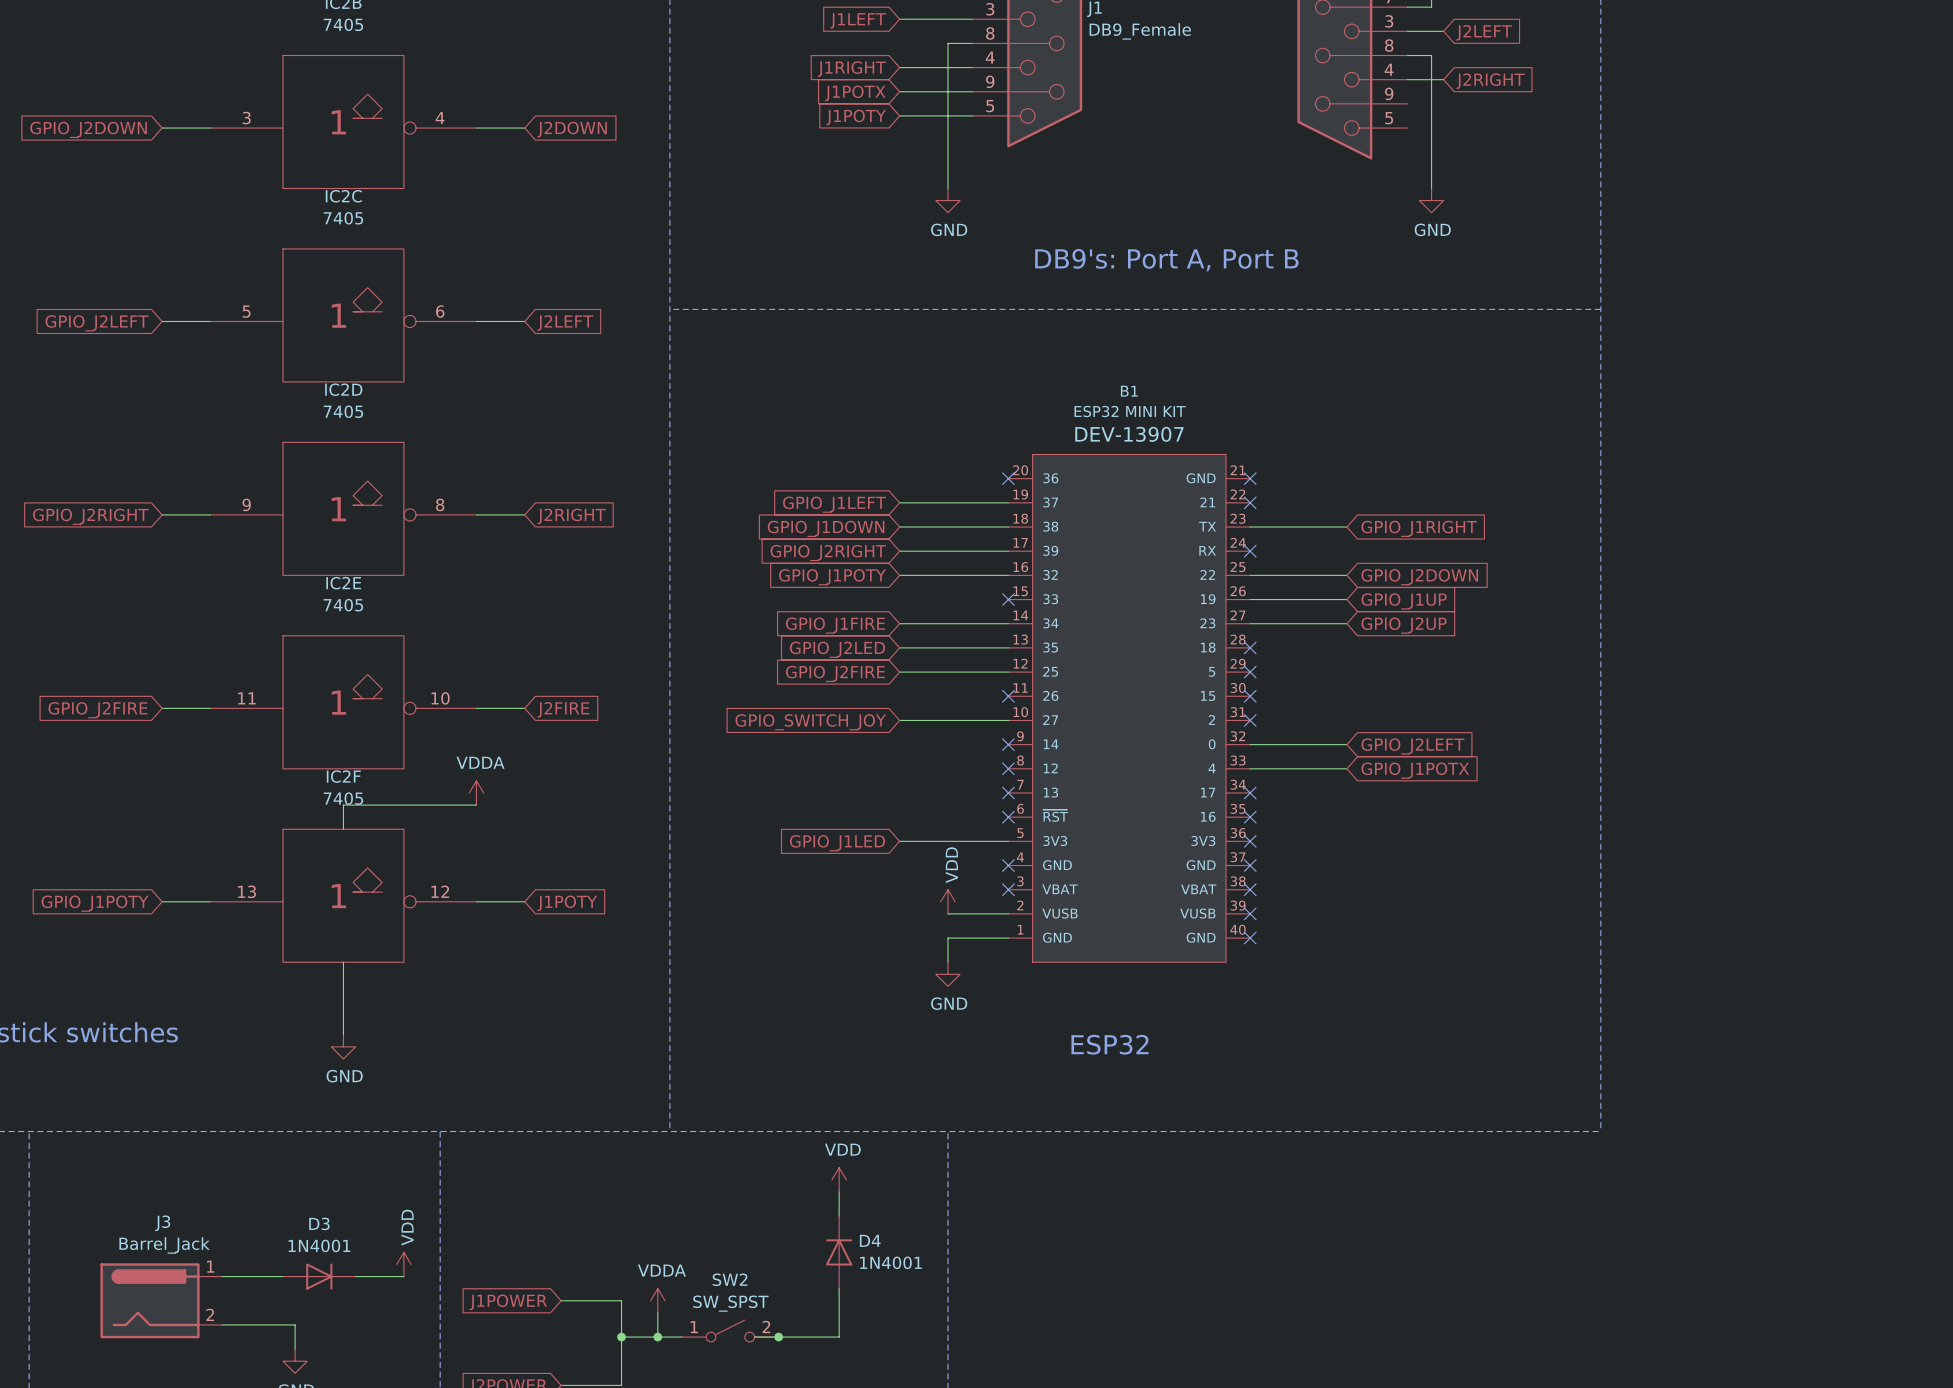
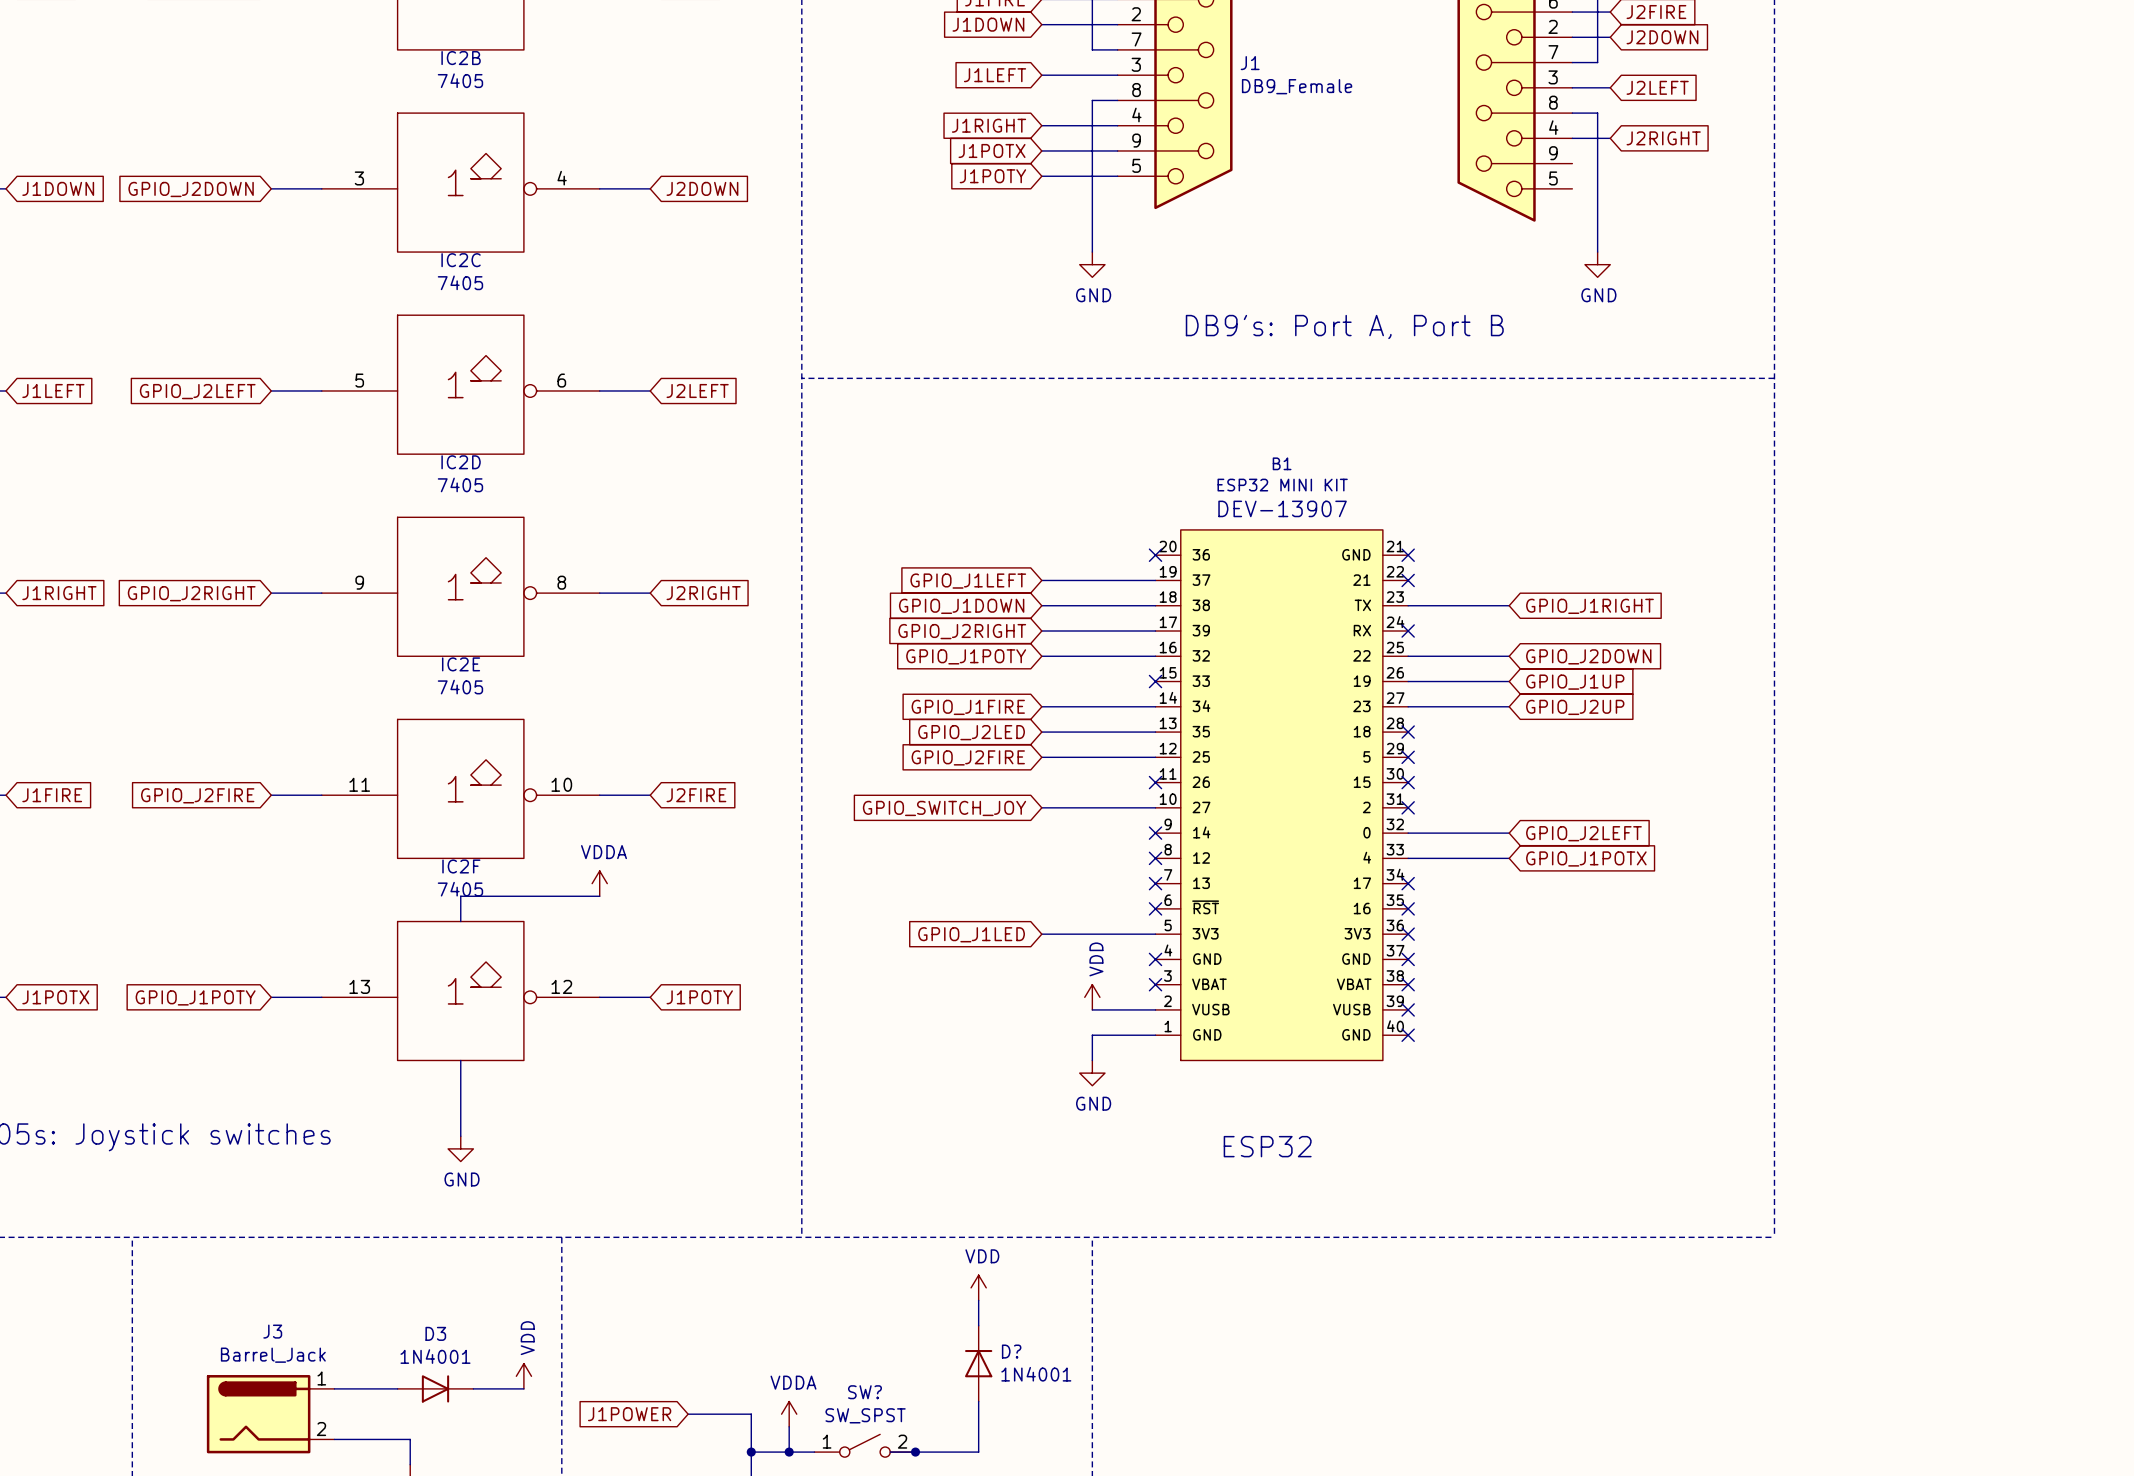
D4 name: D4 (870, 1240) -> D? (1011, 1351)
SW2 name: SW2 (730, 1279) -> SW? (864, 1392)

